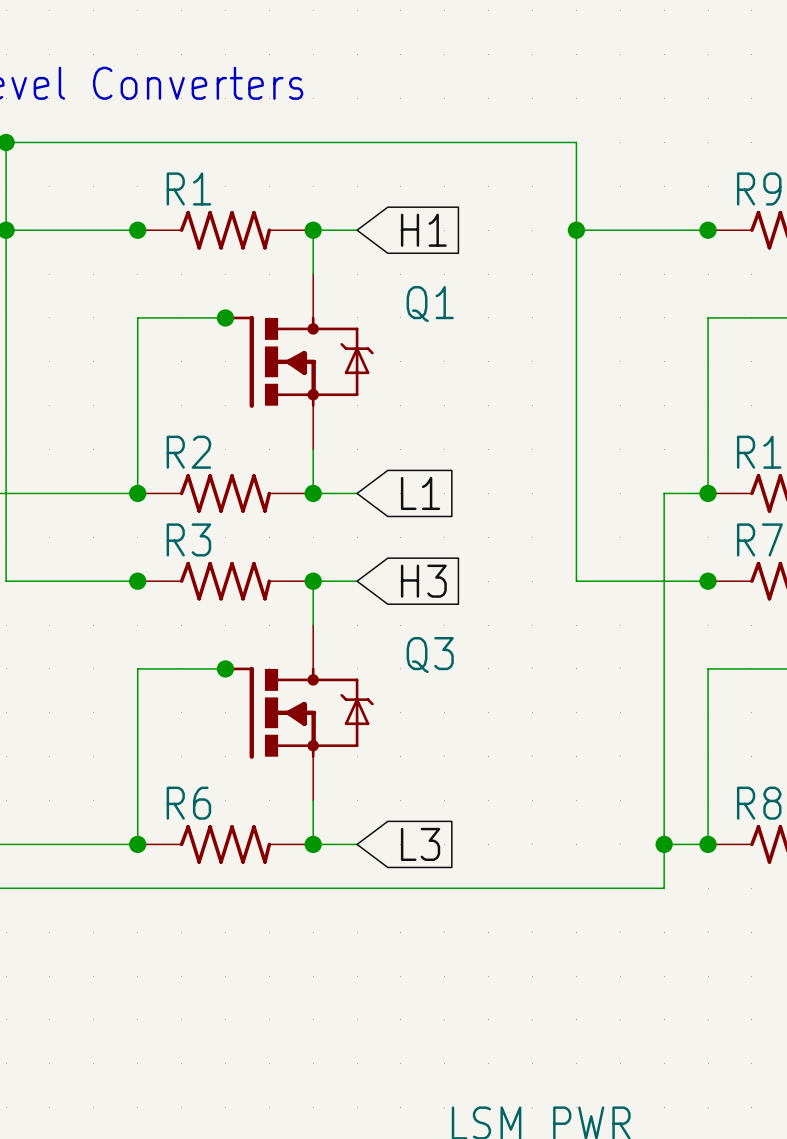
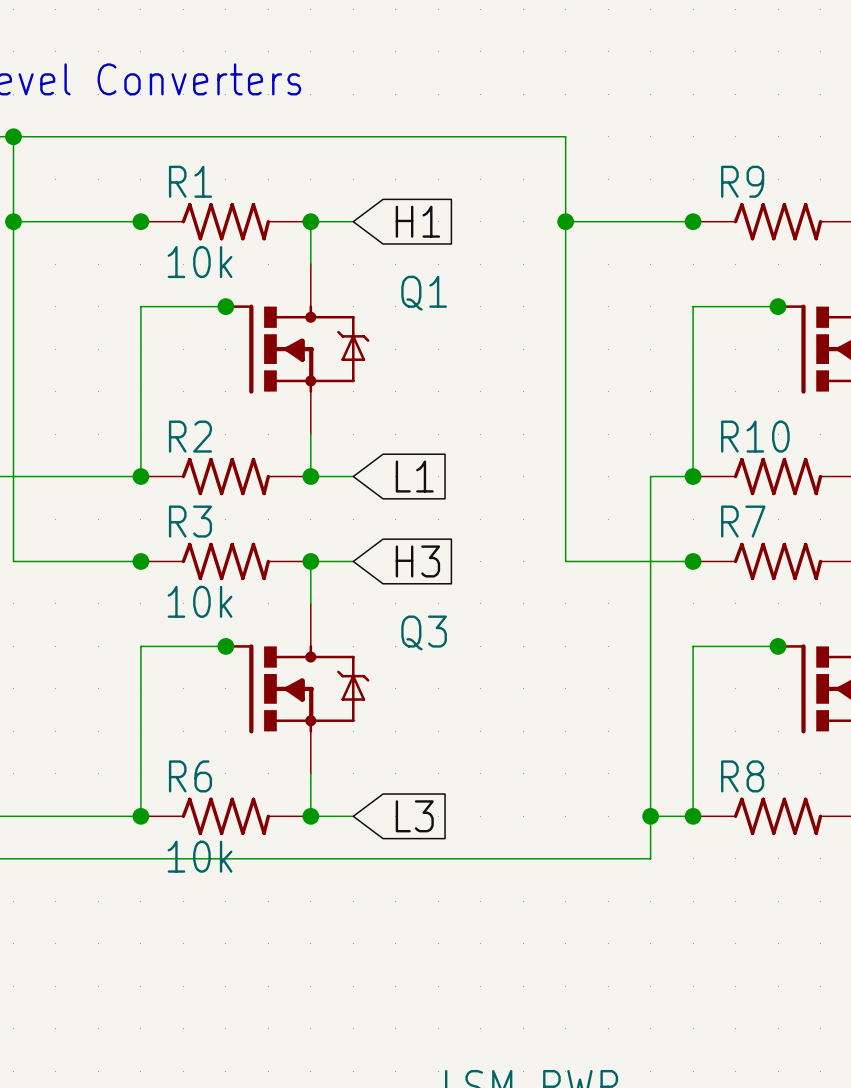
R1 value: none -> 10k (200, 262)
R3 value: none -> 10k (200, 601)
R6 value: none -> 10k (200, 856)

